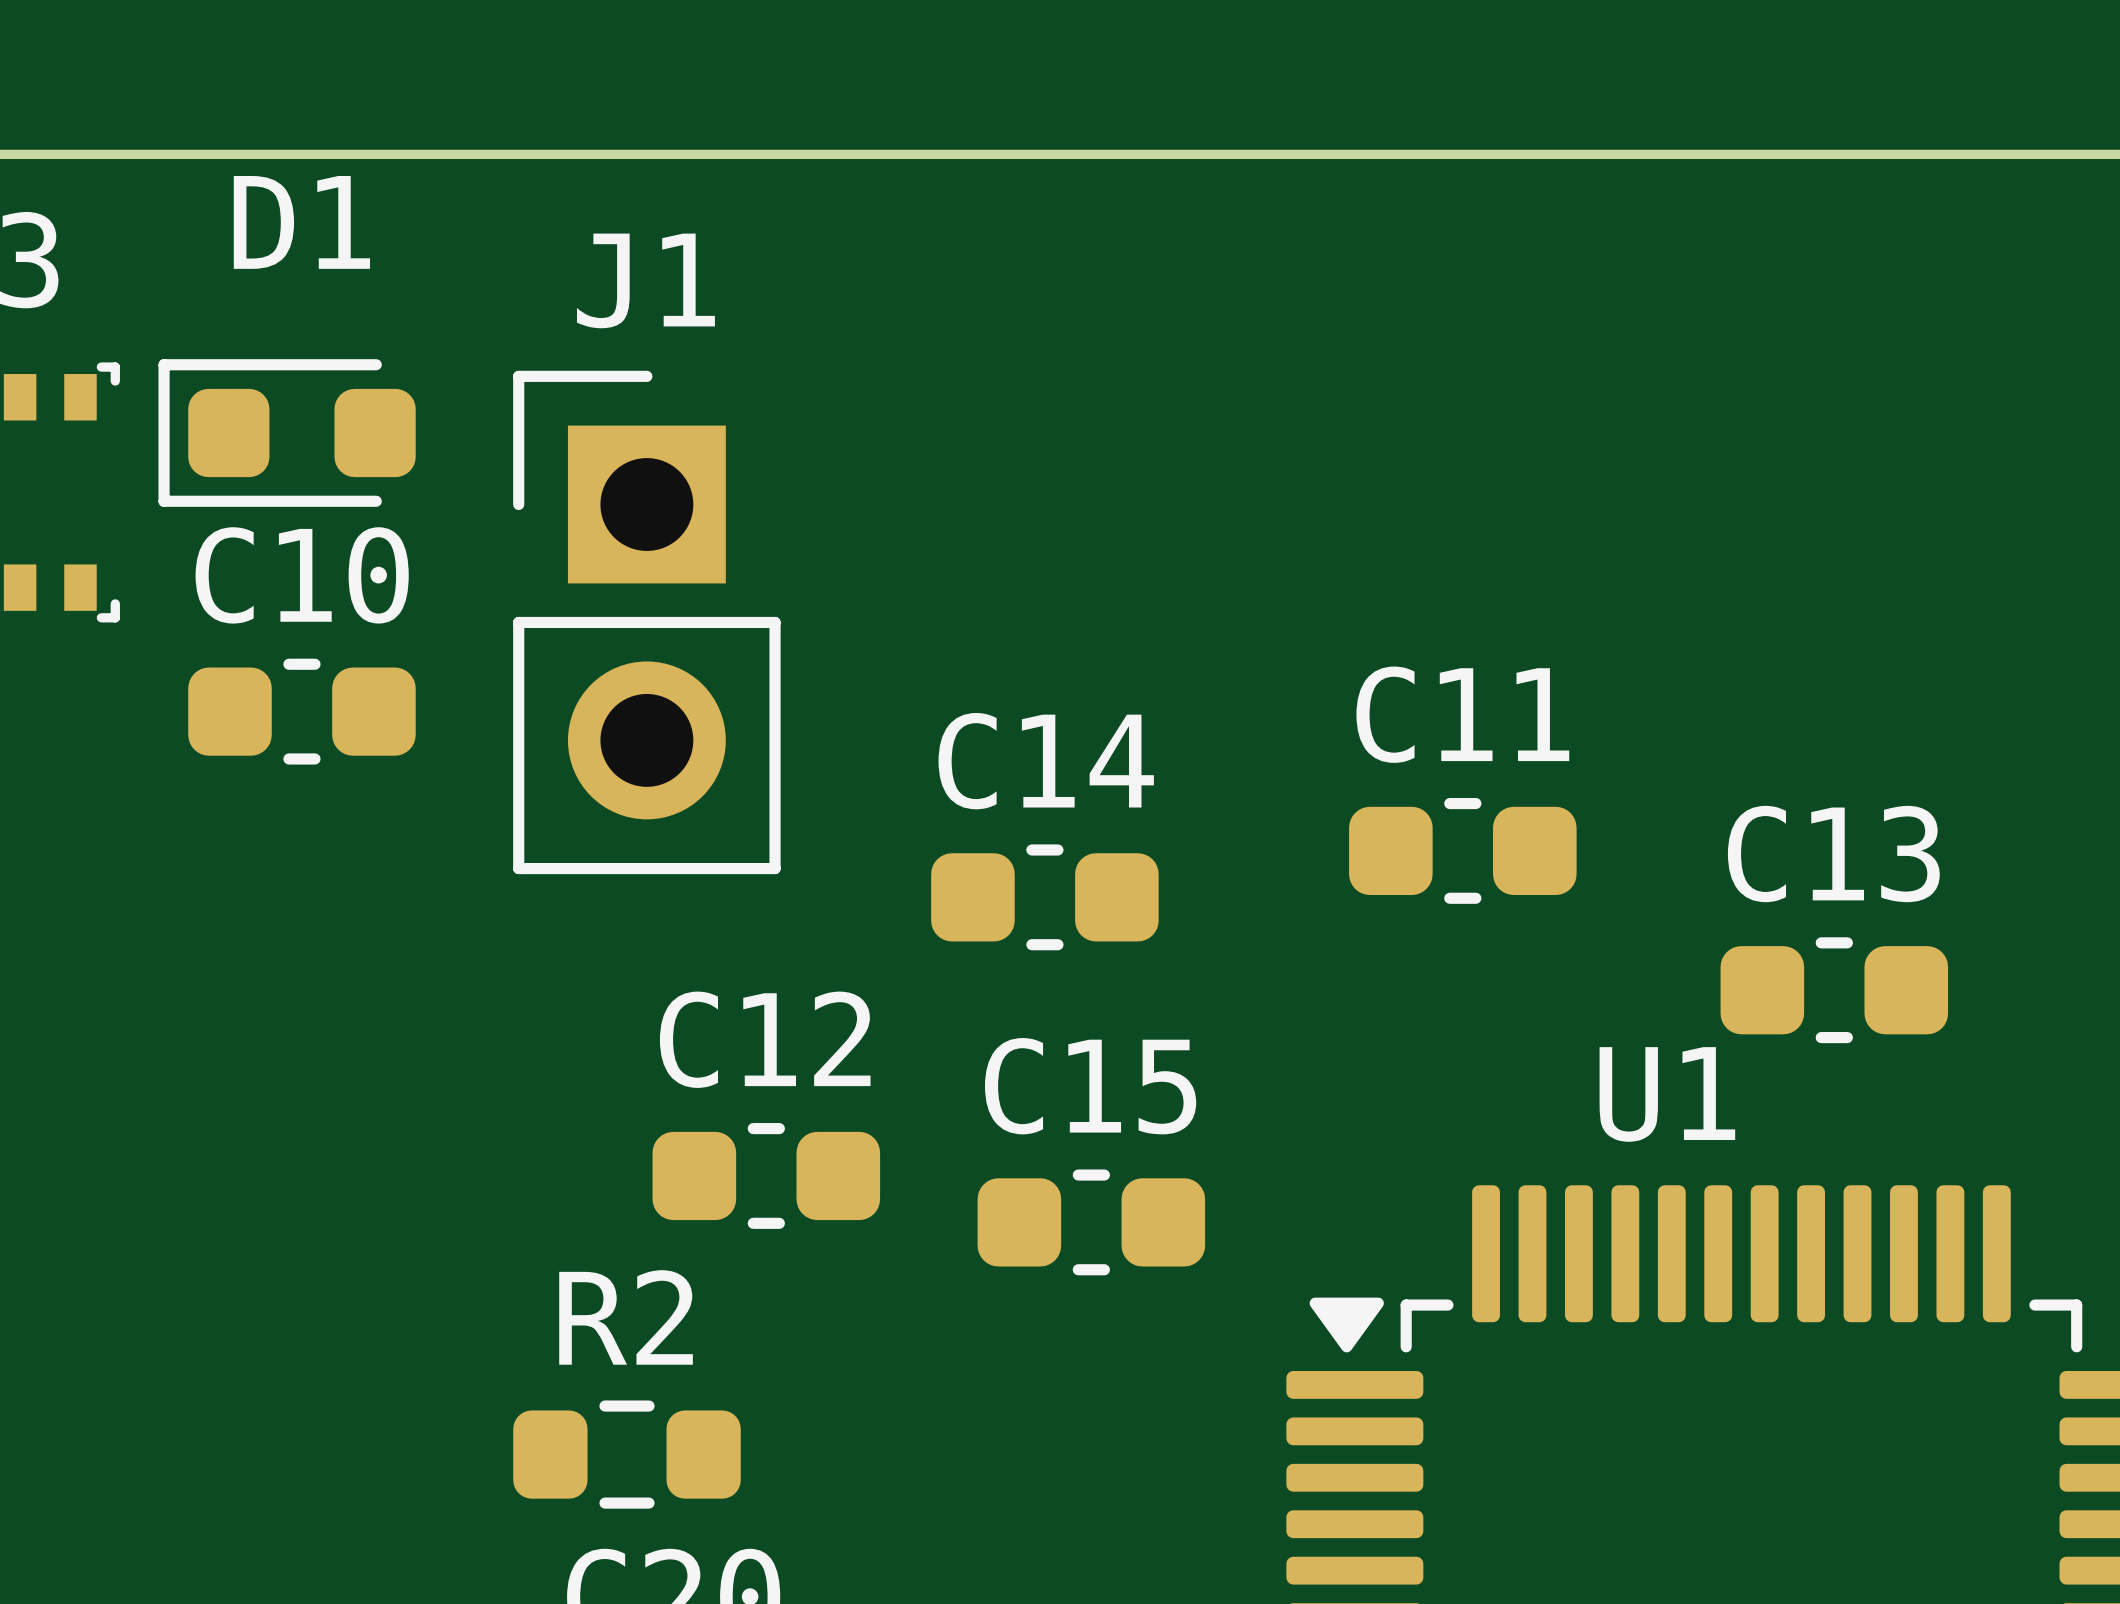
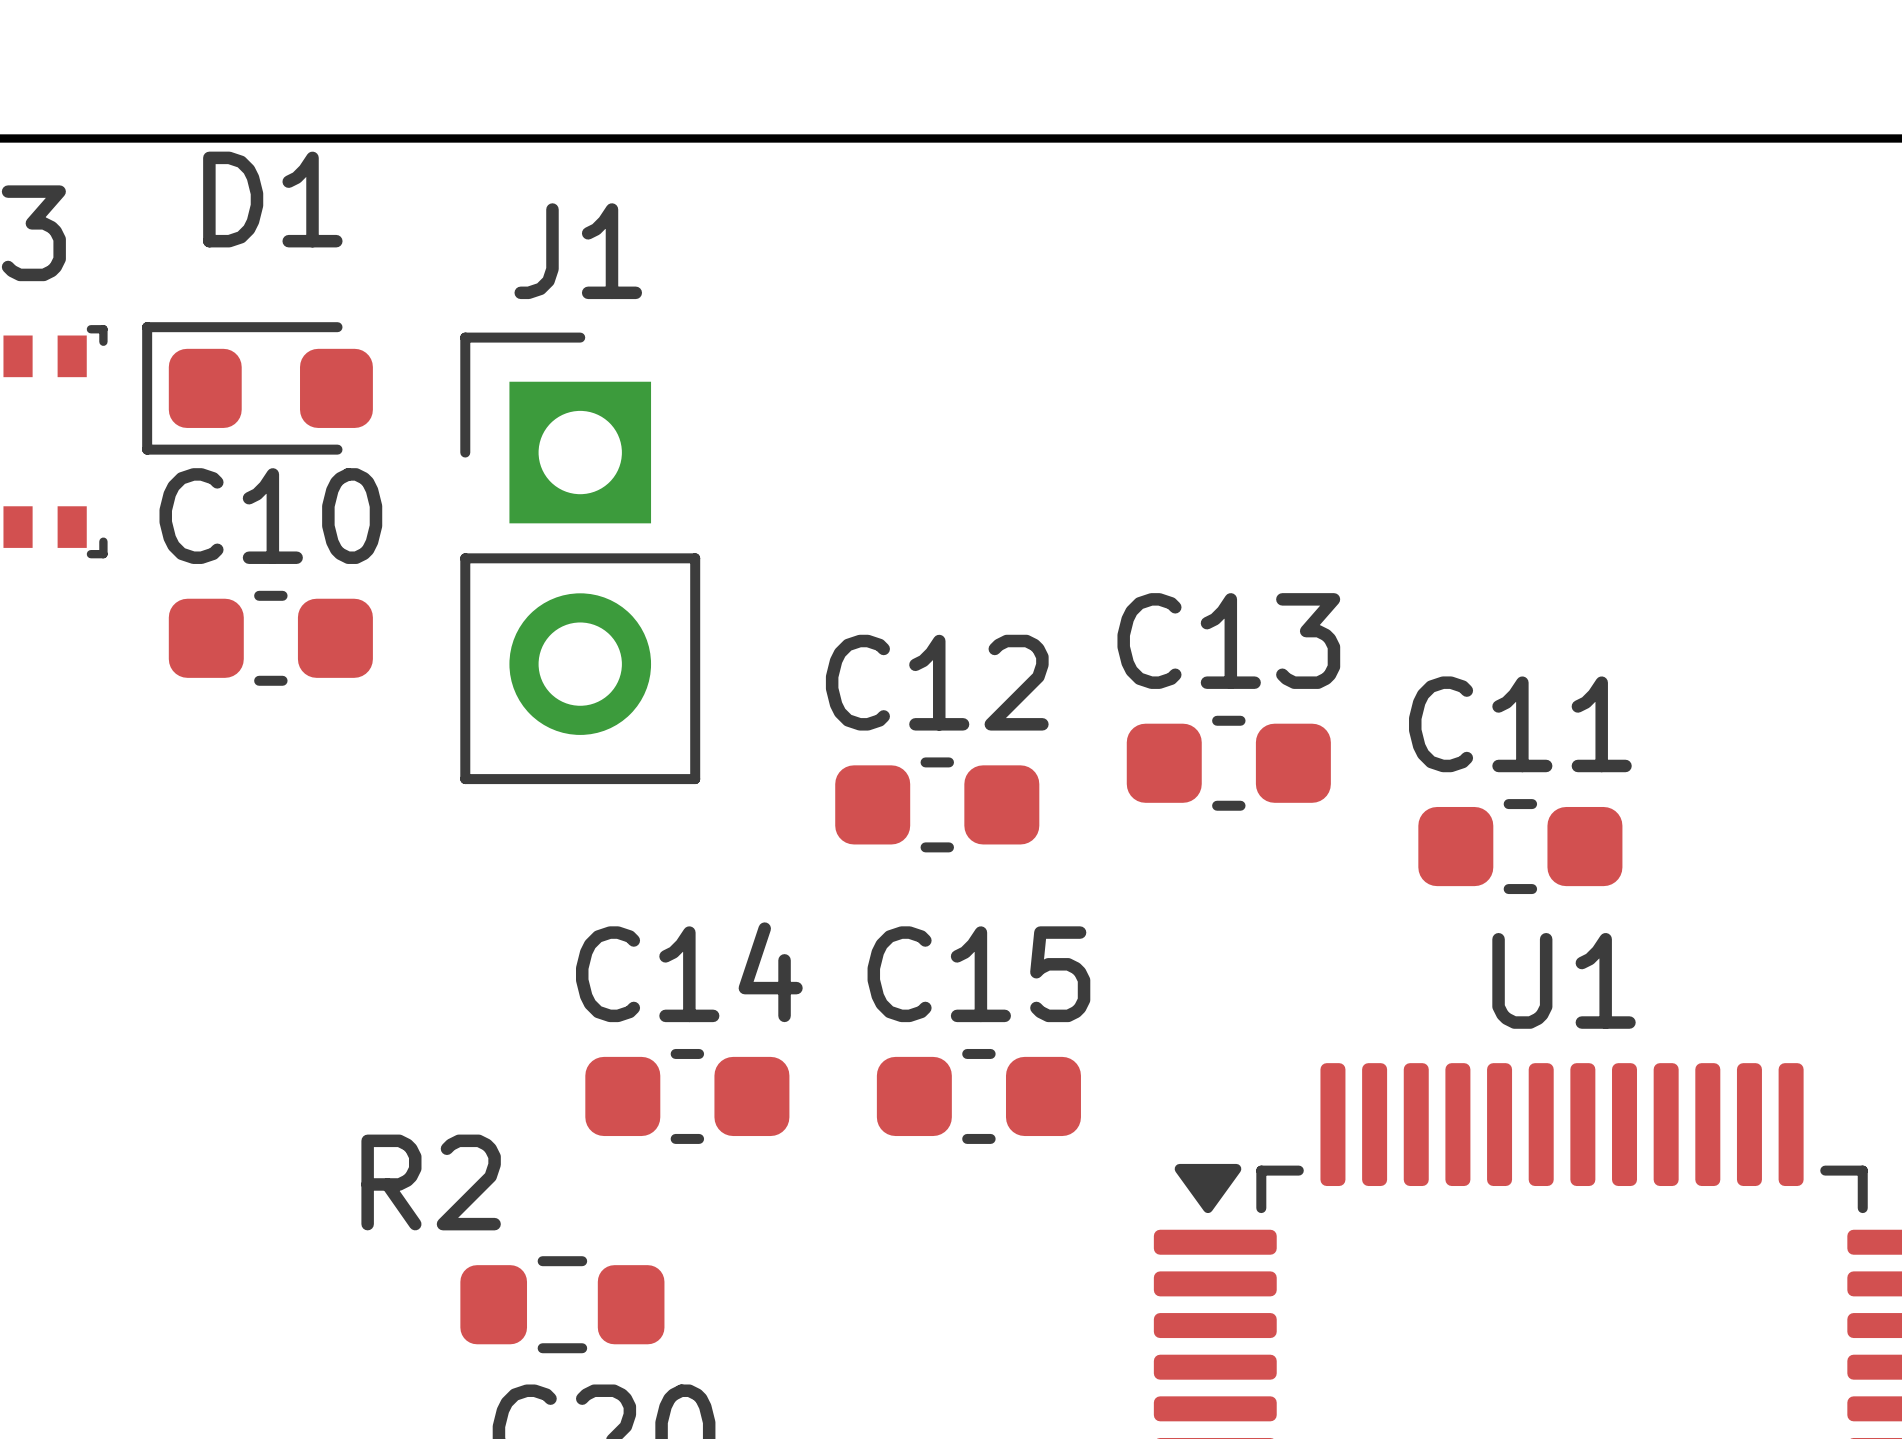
C14 name: C14 (1046, 761) -> C12 (937, 682)
C11 position: (1462, 850) -> (1520, 846)
C13 position: (1834, 990) -> (1228, 763)
C12 name: C12 (765, 1039) -> C14 (689, 972)
U1 name position: U1 (1667, 1094) -> U1 (1564, 980)
C12 position: (766, 1175) -> (687, 1096)
R2 name position: R2 (626, 1317) -> R2 (431, 1182)

